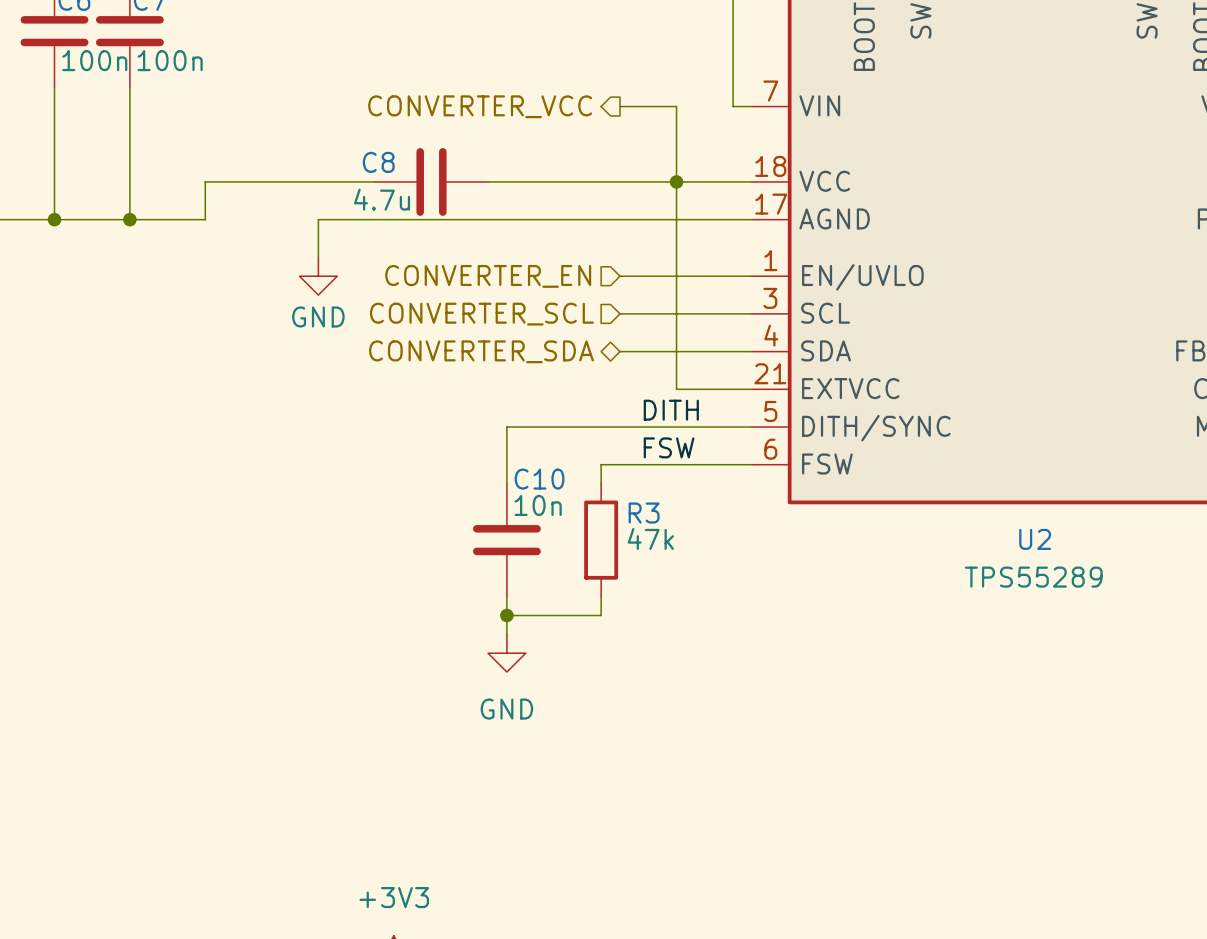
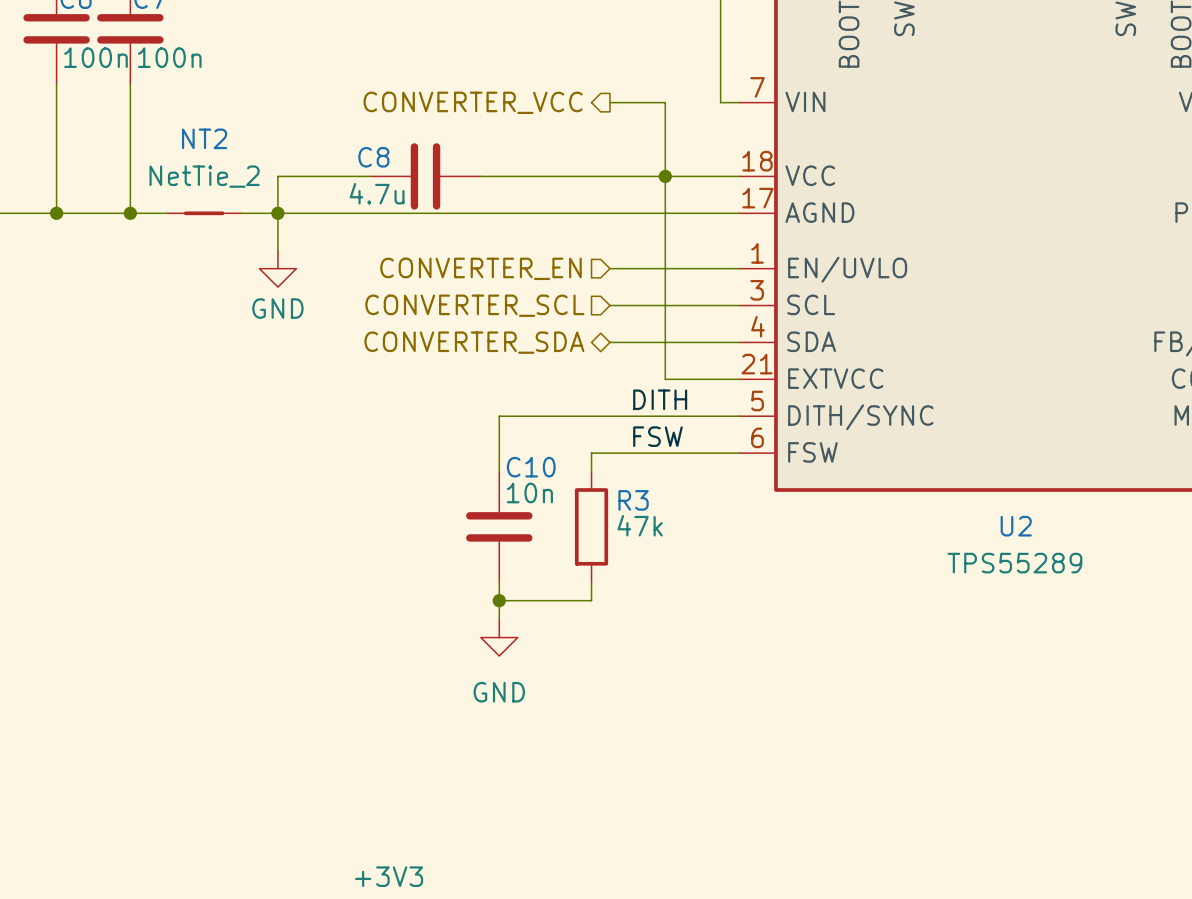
wire: (280, 181) (205, 181) (205, 219) (167, 219) -> (277, 176) (277, 250)
NT2: none -> NetTie_2 (204, 213)
junction: none -> (277, 213)
wire: (318, 219) (318, 257) -> (314, 213) (241, 213)
power symbol position: GND (318, 276) -> GND (277, 268)

